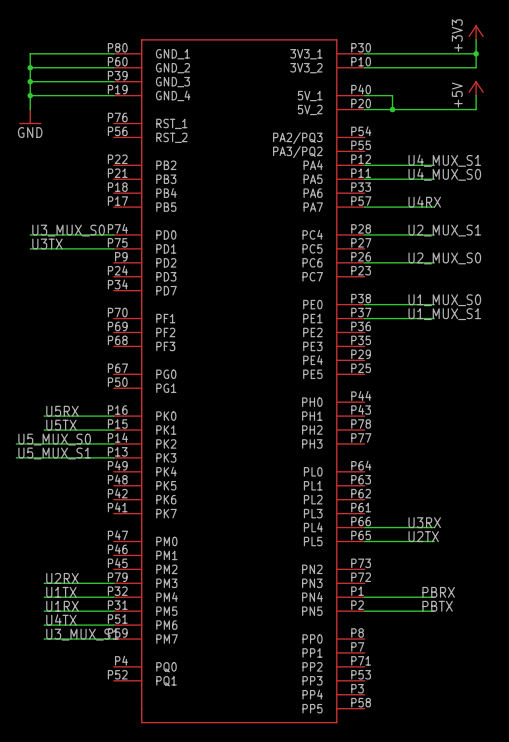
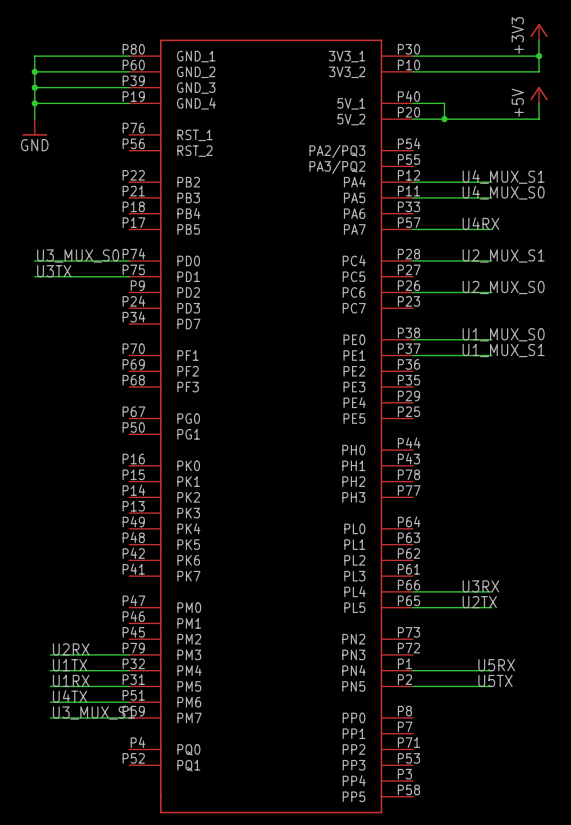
label: U5RX (62, 411) -> none
wire: (44, 416) (113, 416) -> none
label: U5TX (61, 425) -> none
wire: (44, 430) (113, 430) -> none
label: U5_MUX_S0 (54, 439) -> none
wire: (16, 443) (113, 443) -> none
label: U5_MUX_S1 (54, 453) -> none
wire: (16, 457) (113, 457) -> none
label: PBRX (438, 592) -> U5RX (496, 665)
label: PBTX (437, 606) -> U5TX (495, 680)

